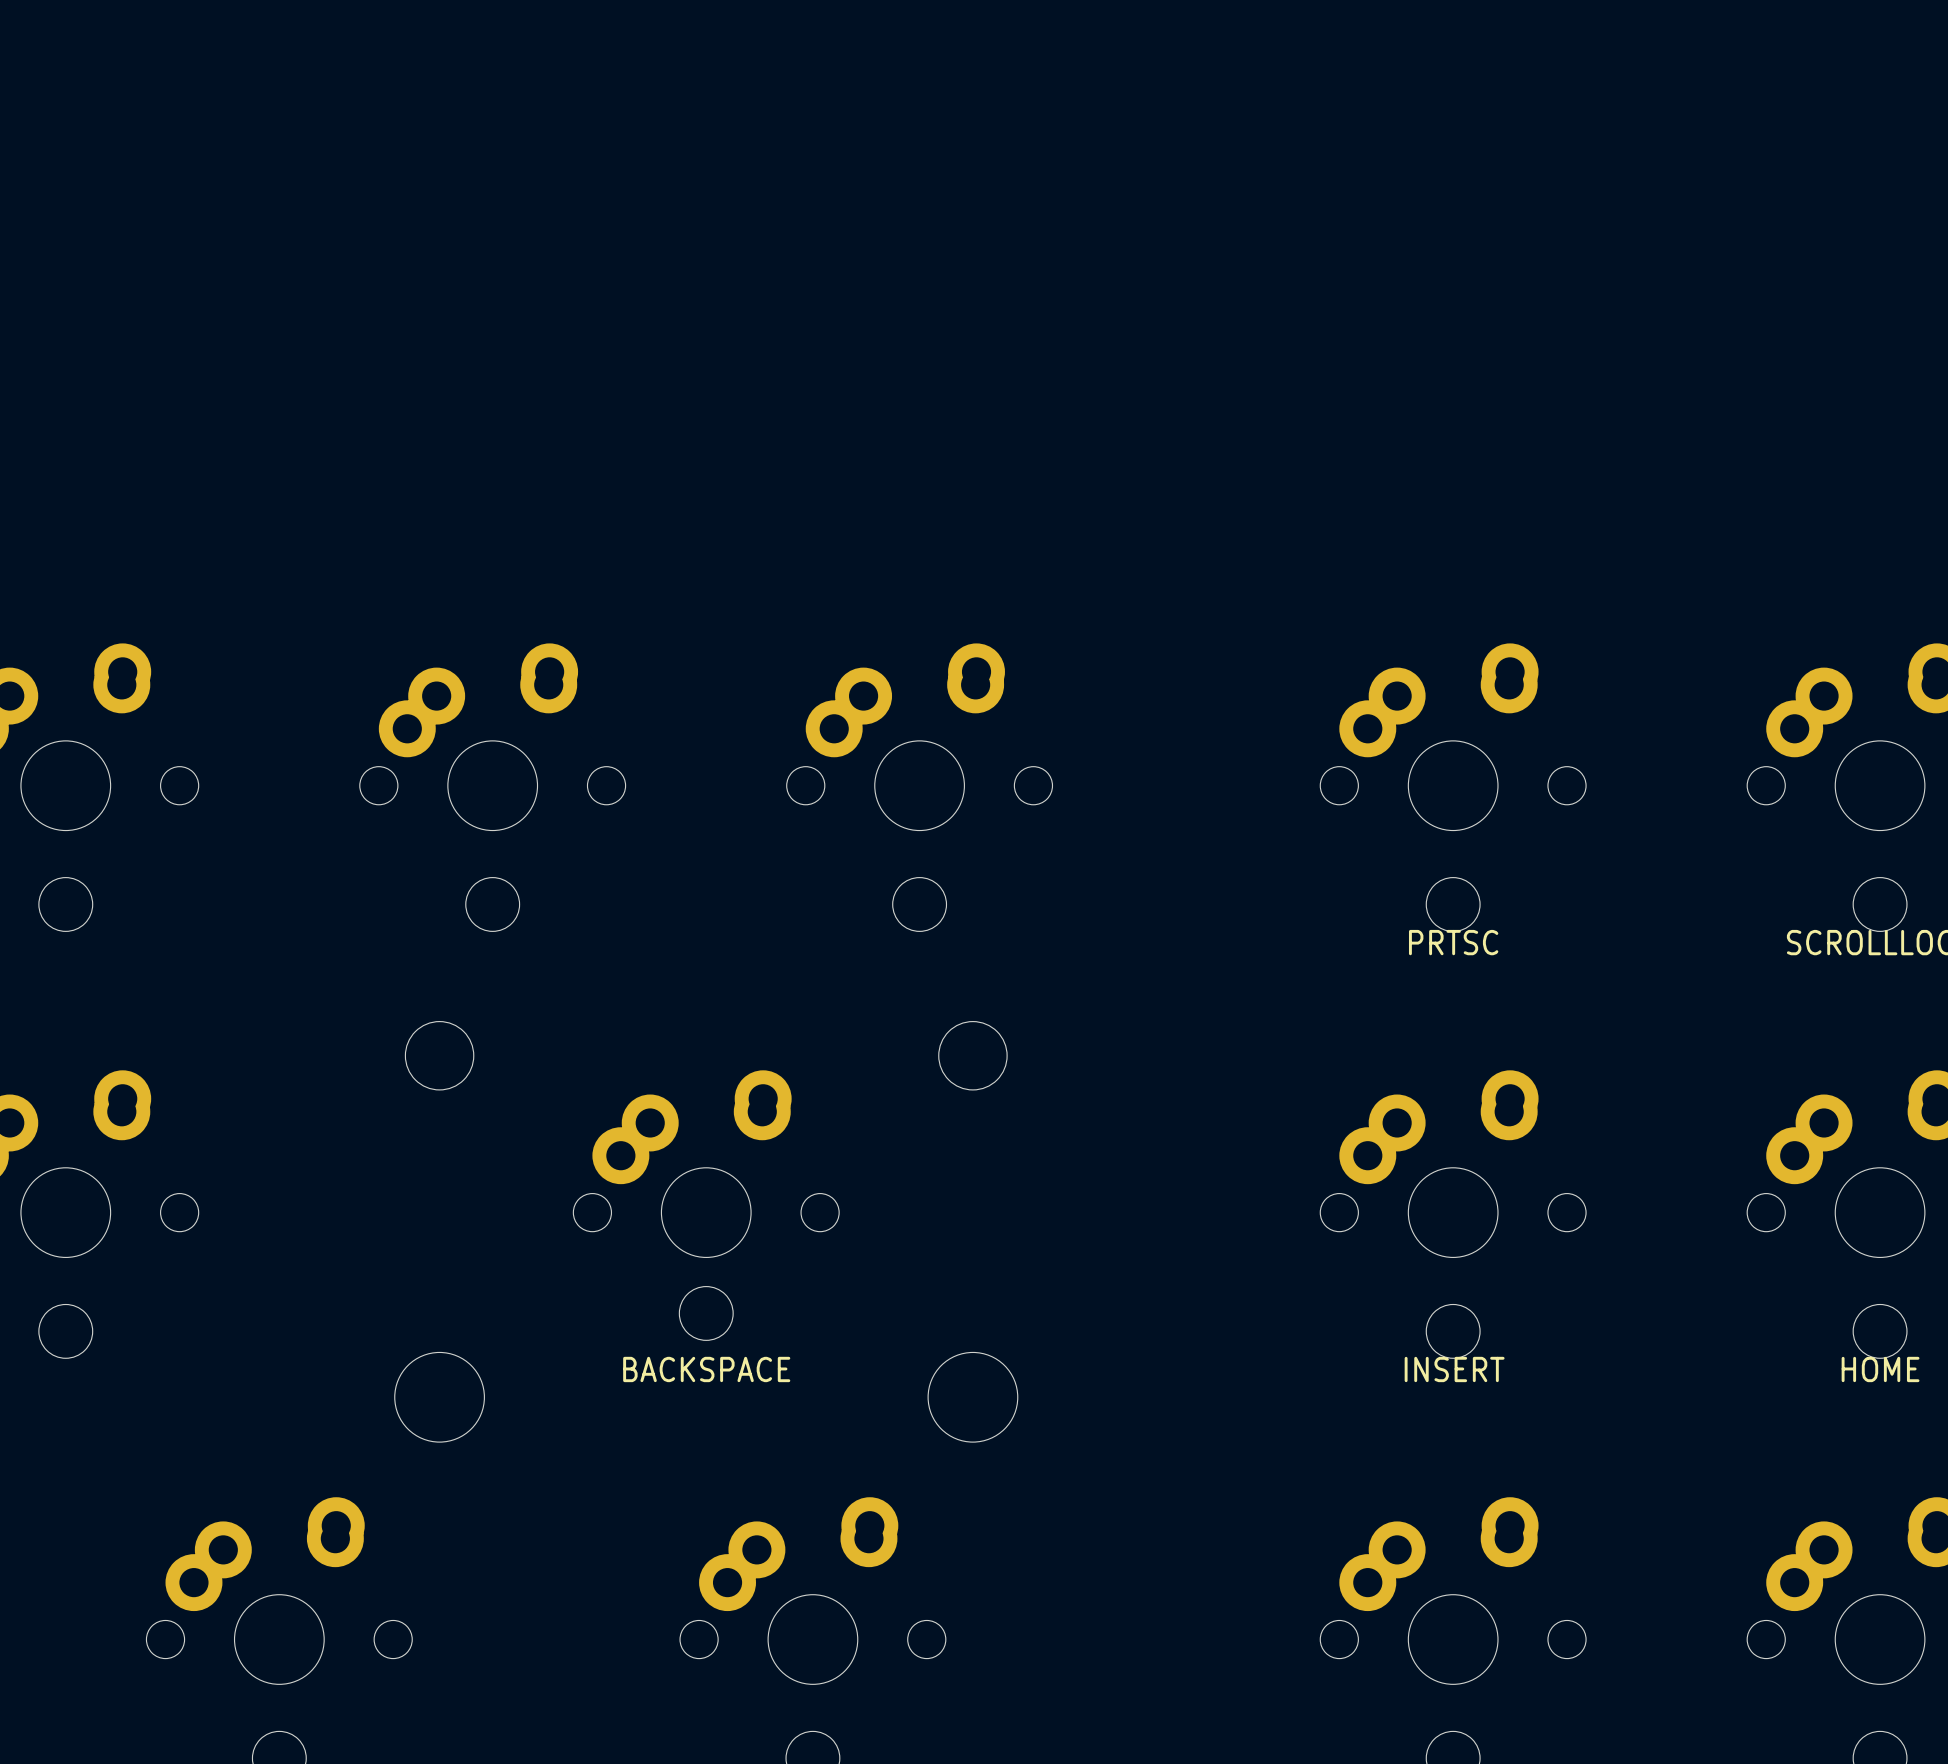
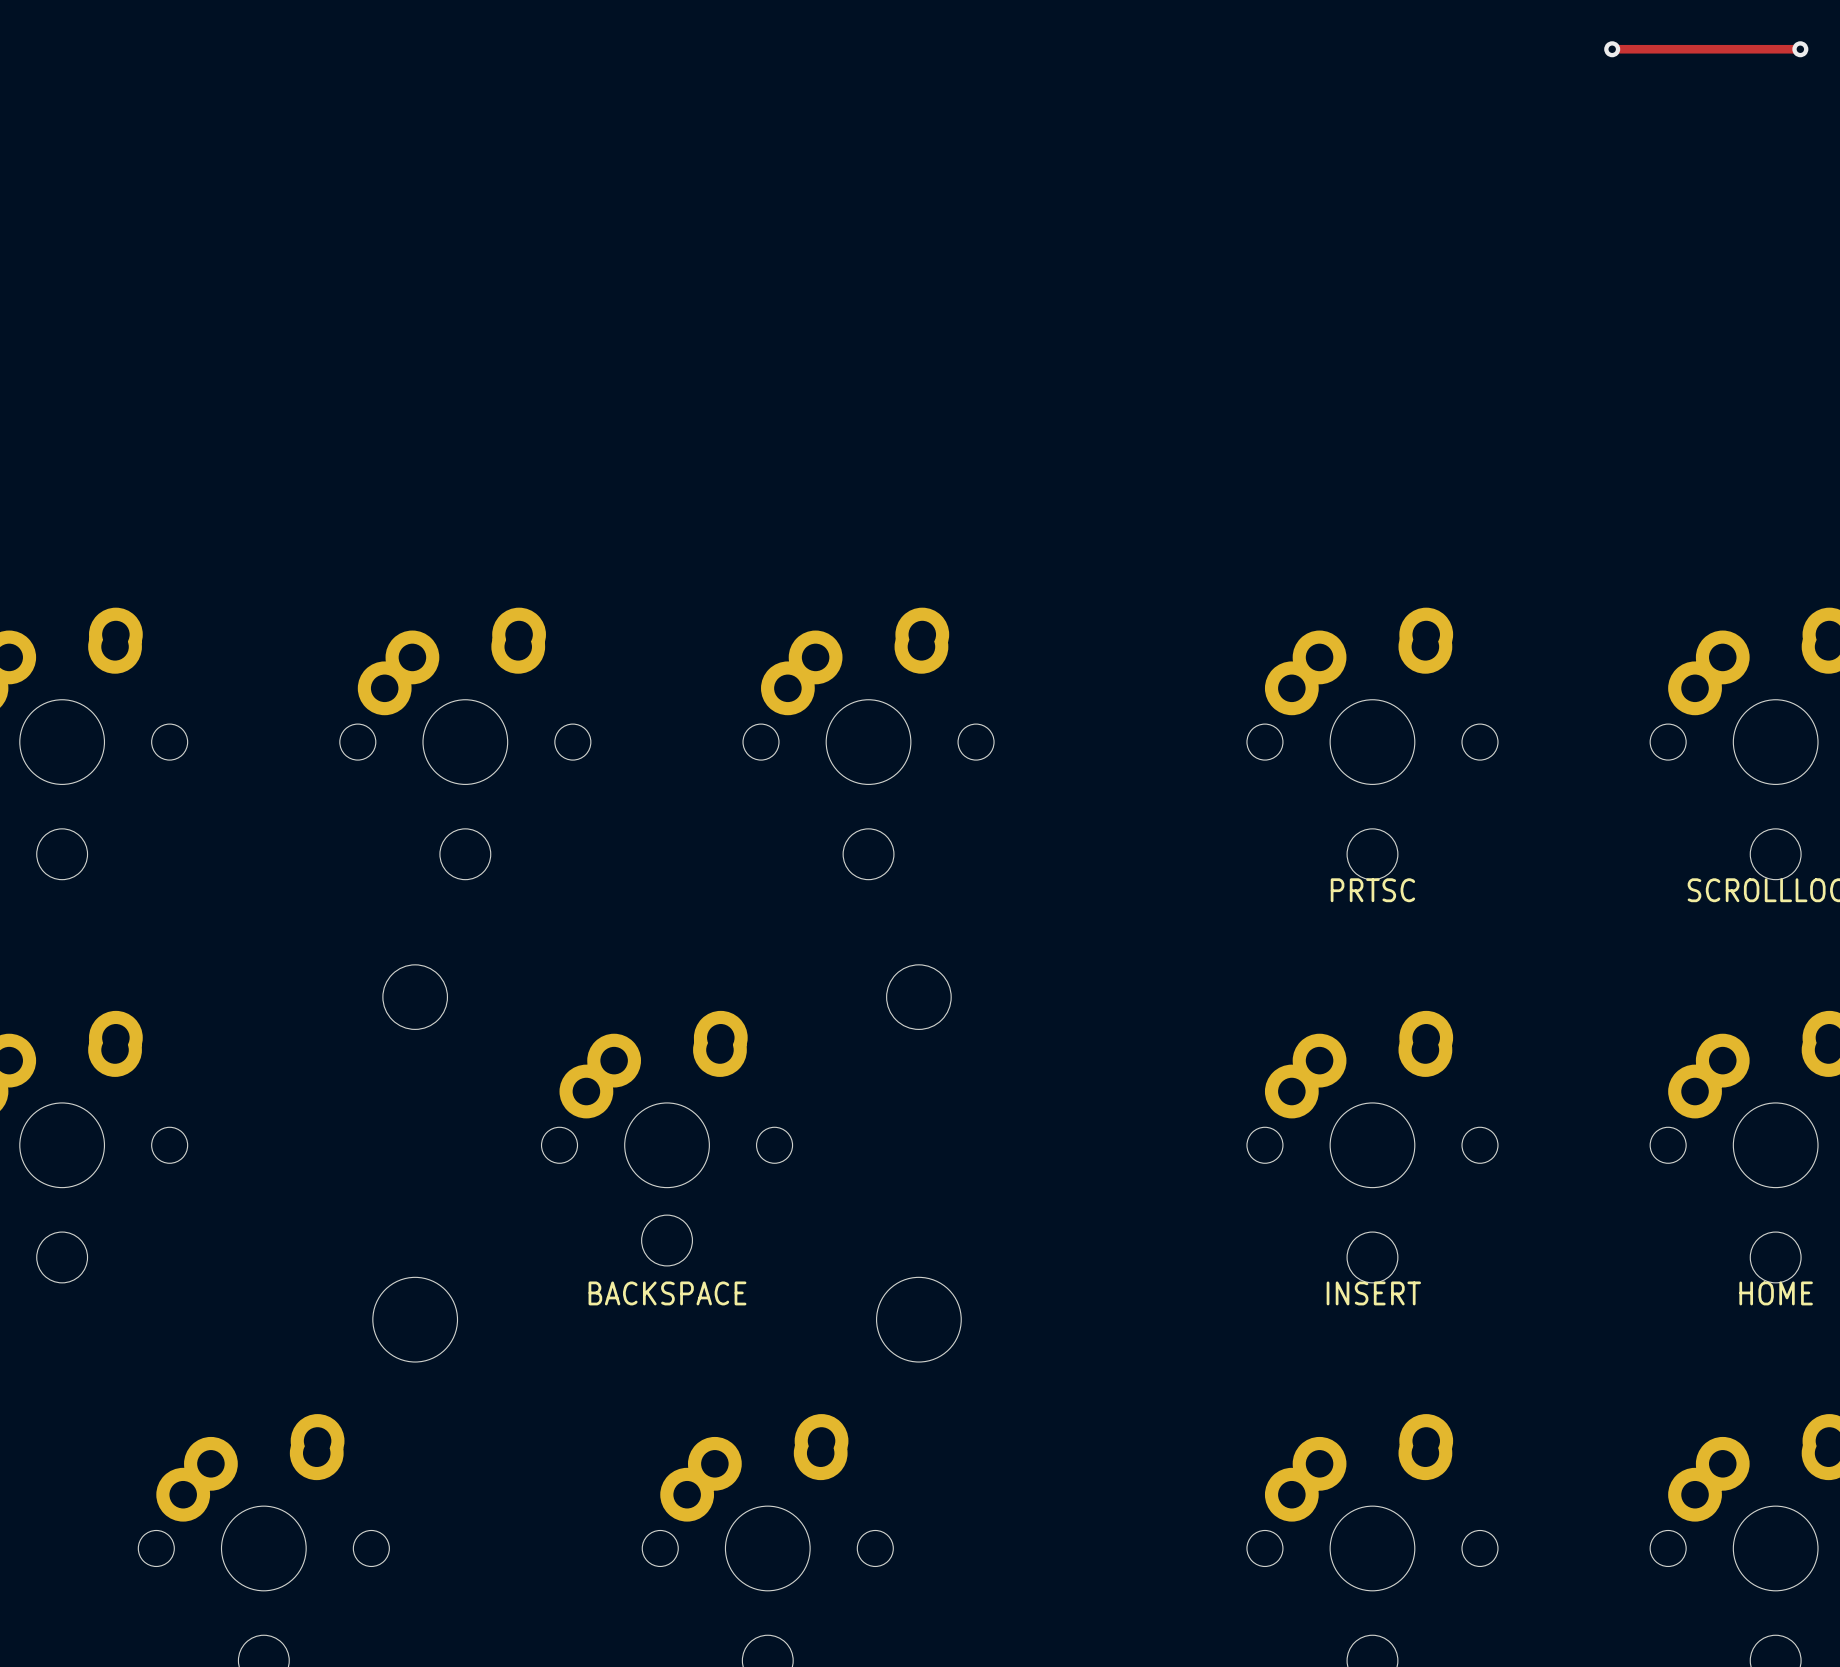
track: none -> (1612, 49) (1800, 49)
via: none -> (1612, 49)
via: none -> (1800, 49)

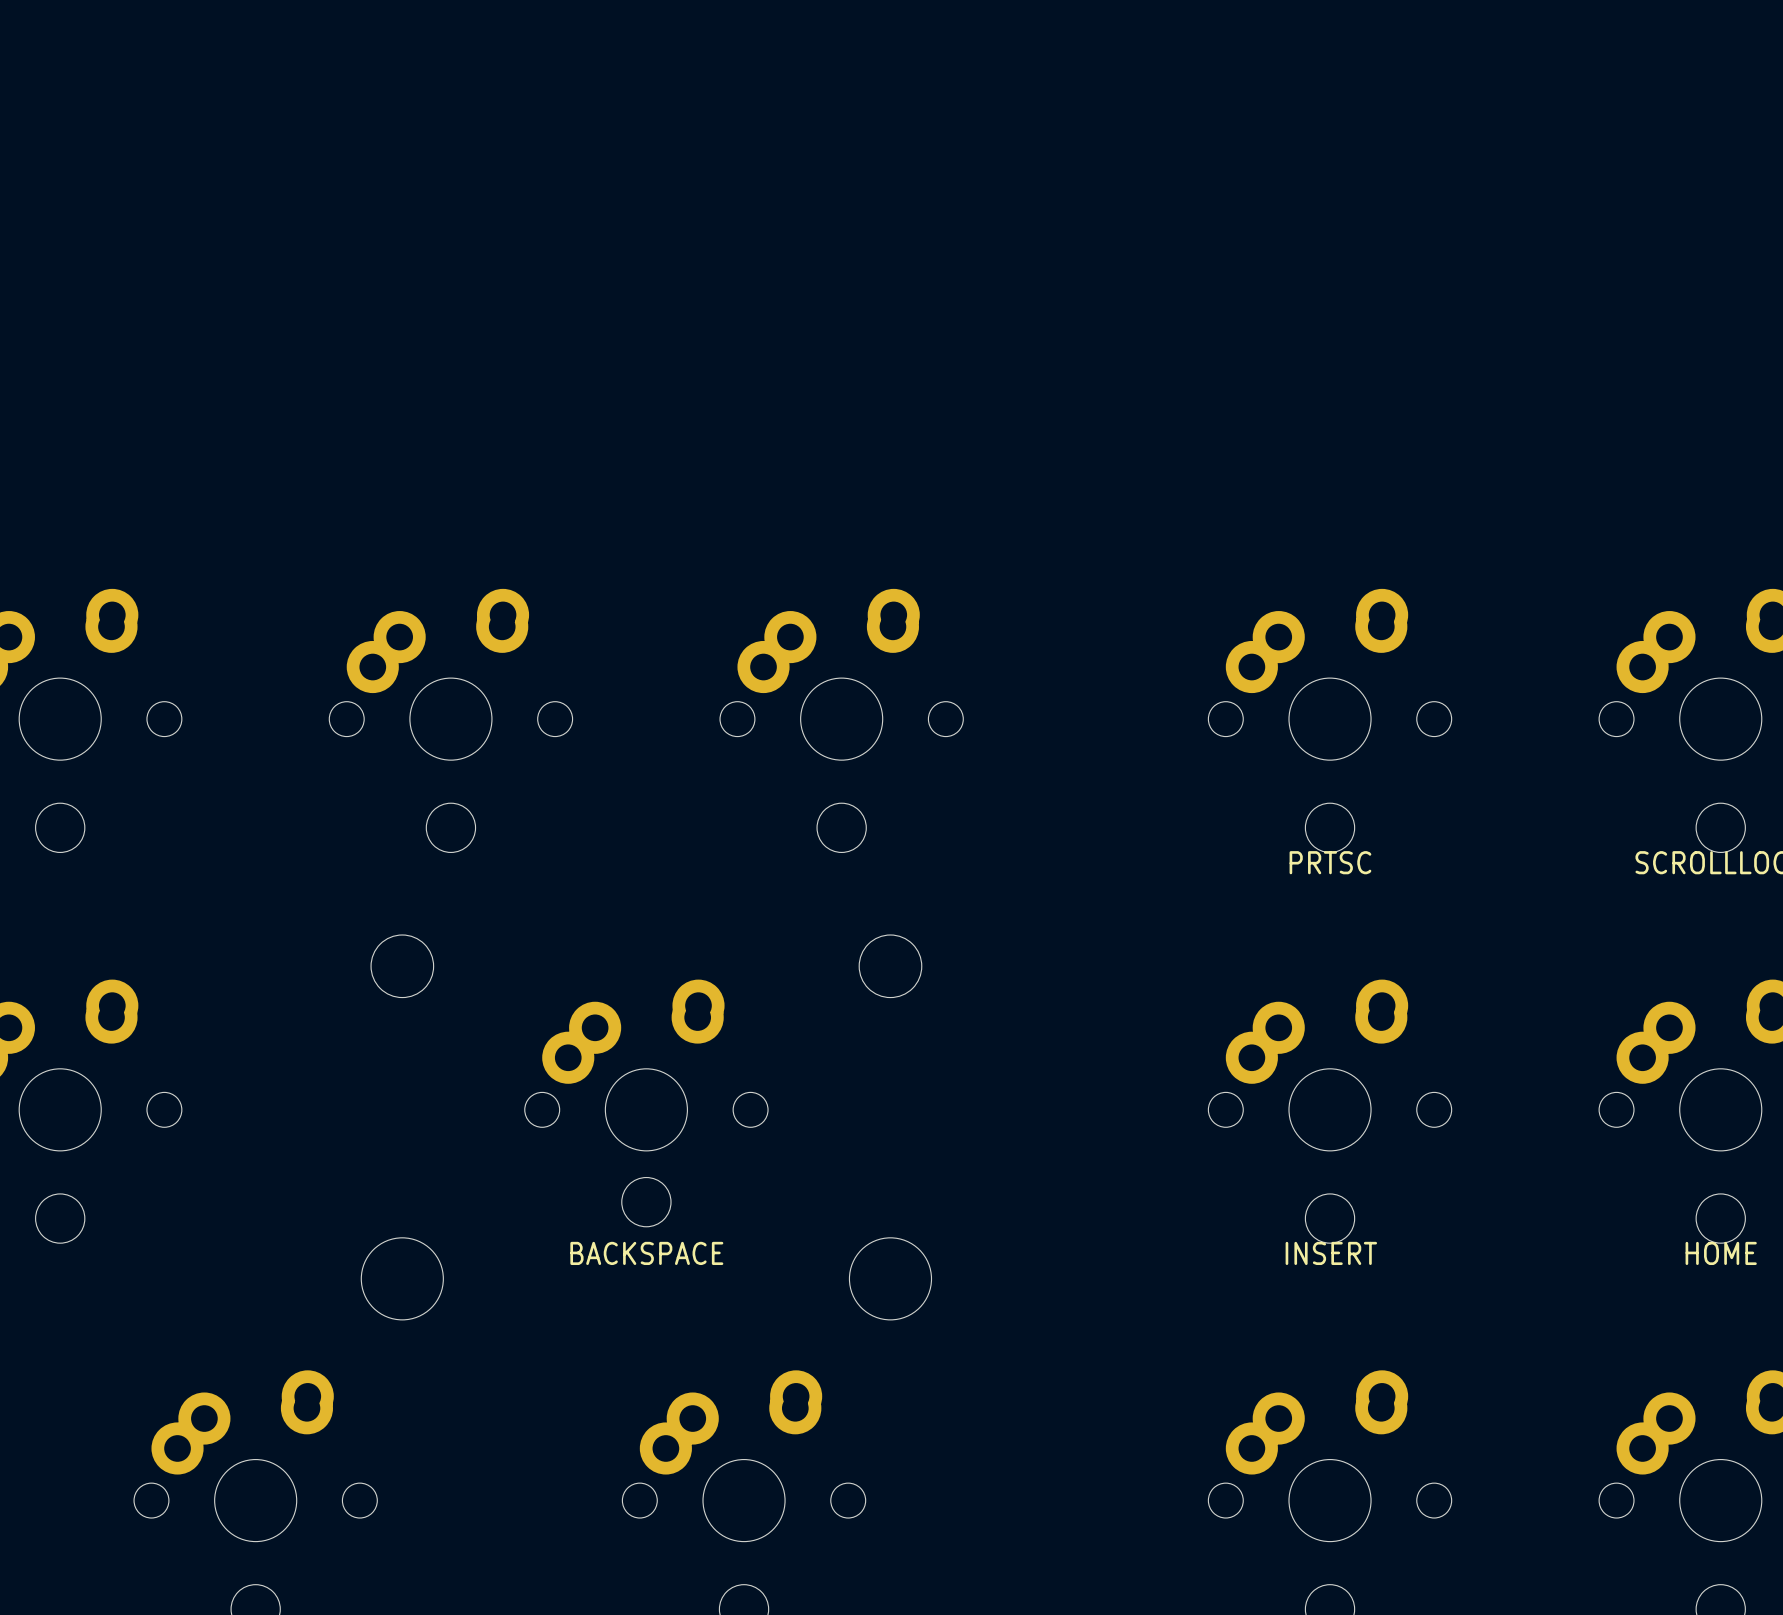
track: (1612, 49) (1800, 49) -> none
via: (1612, 49) -> none
via: (1800, 49) -> none

